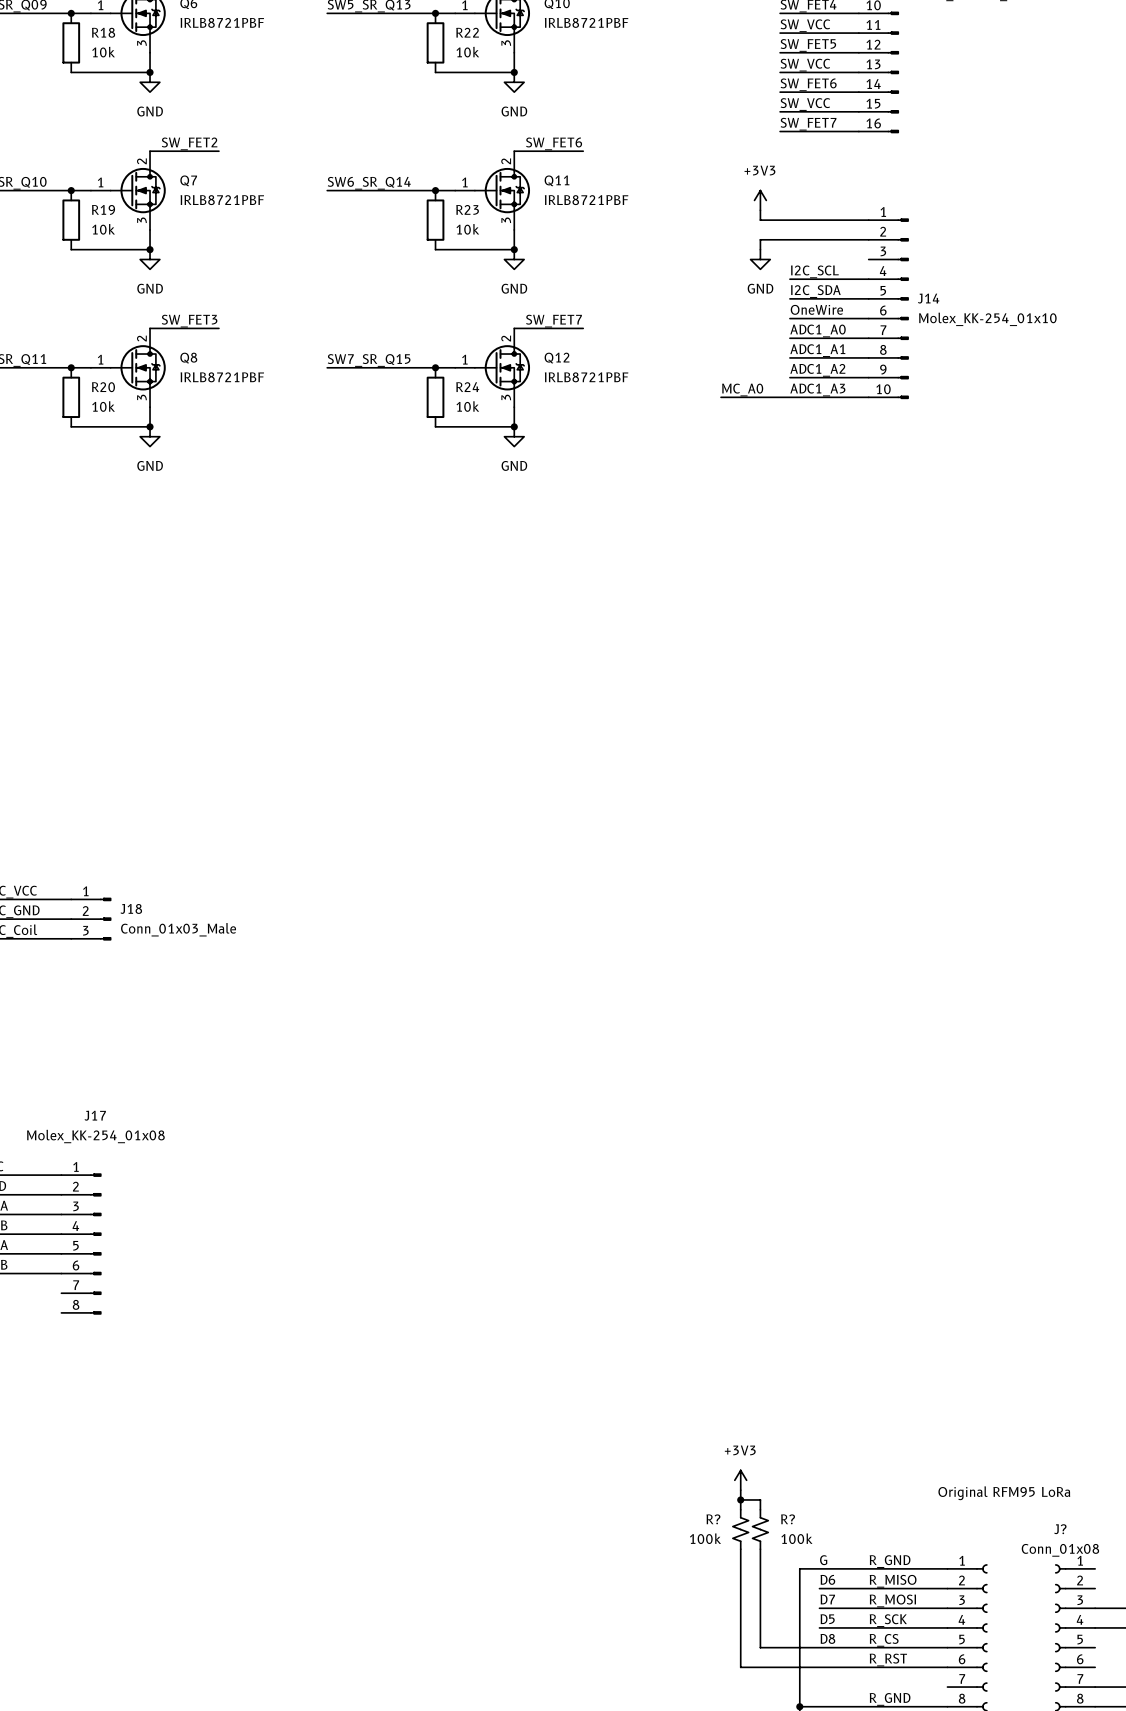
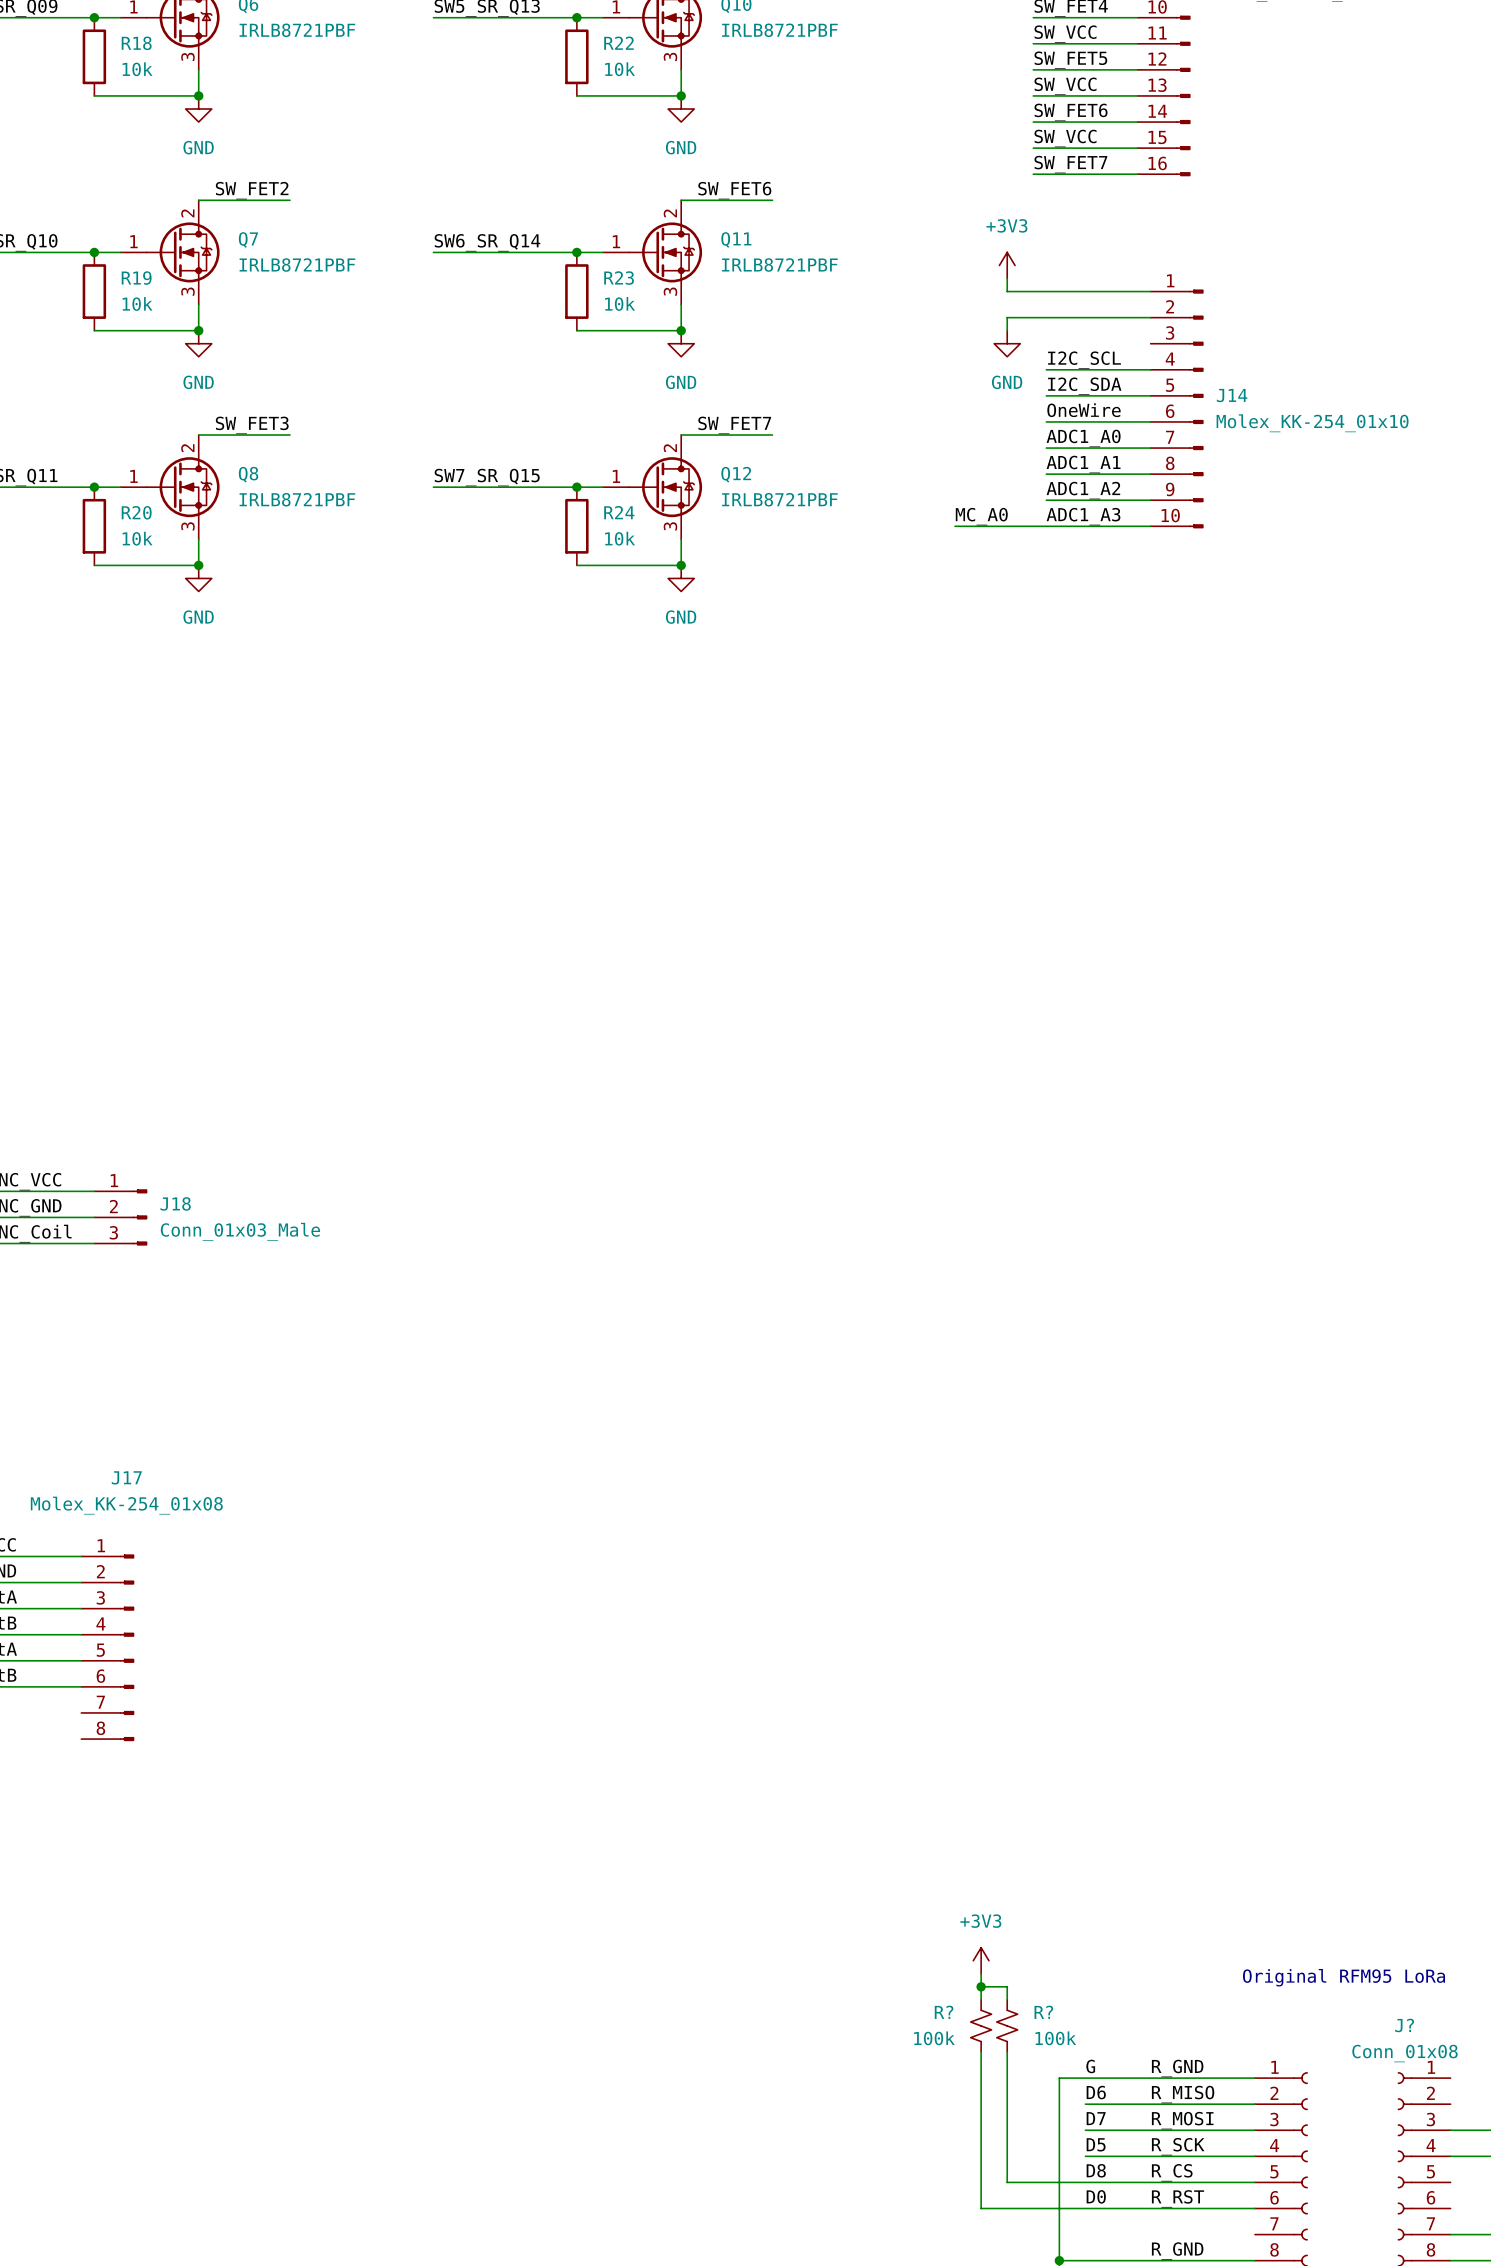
label: none -> D0 (1096, 2196)

